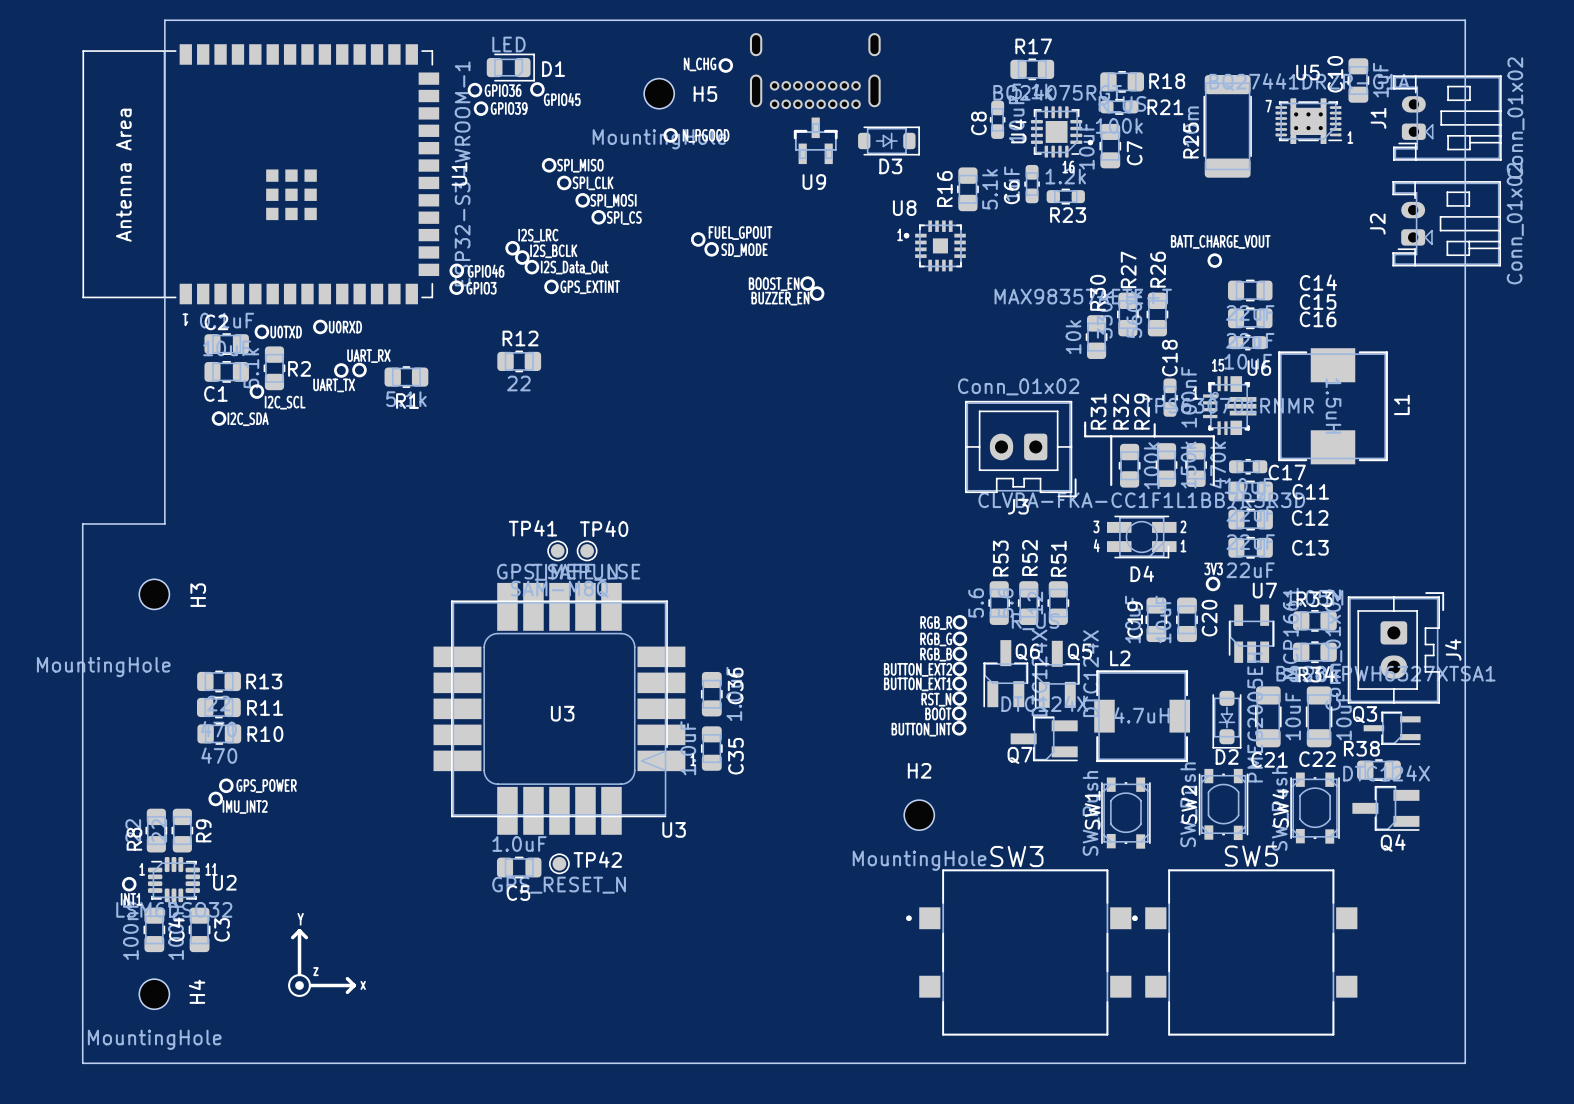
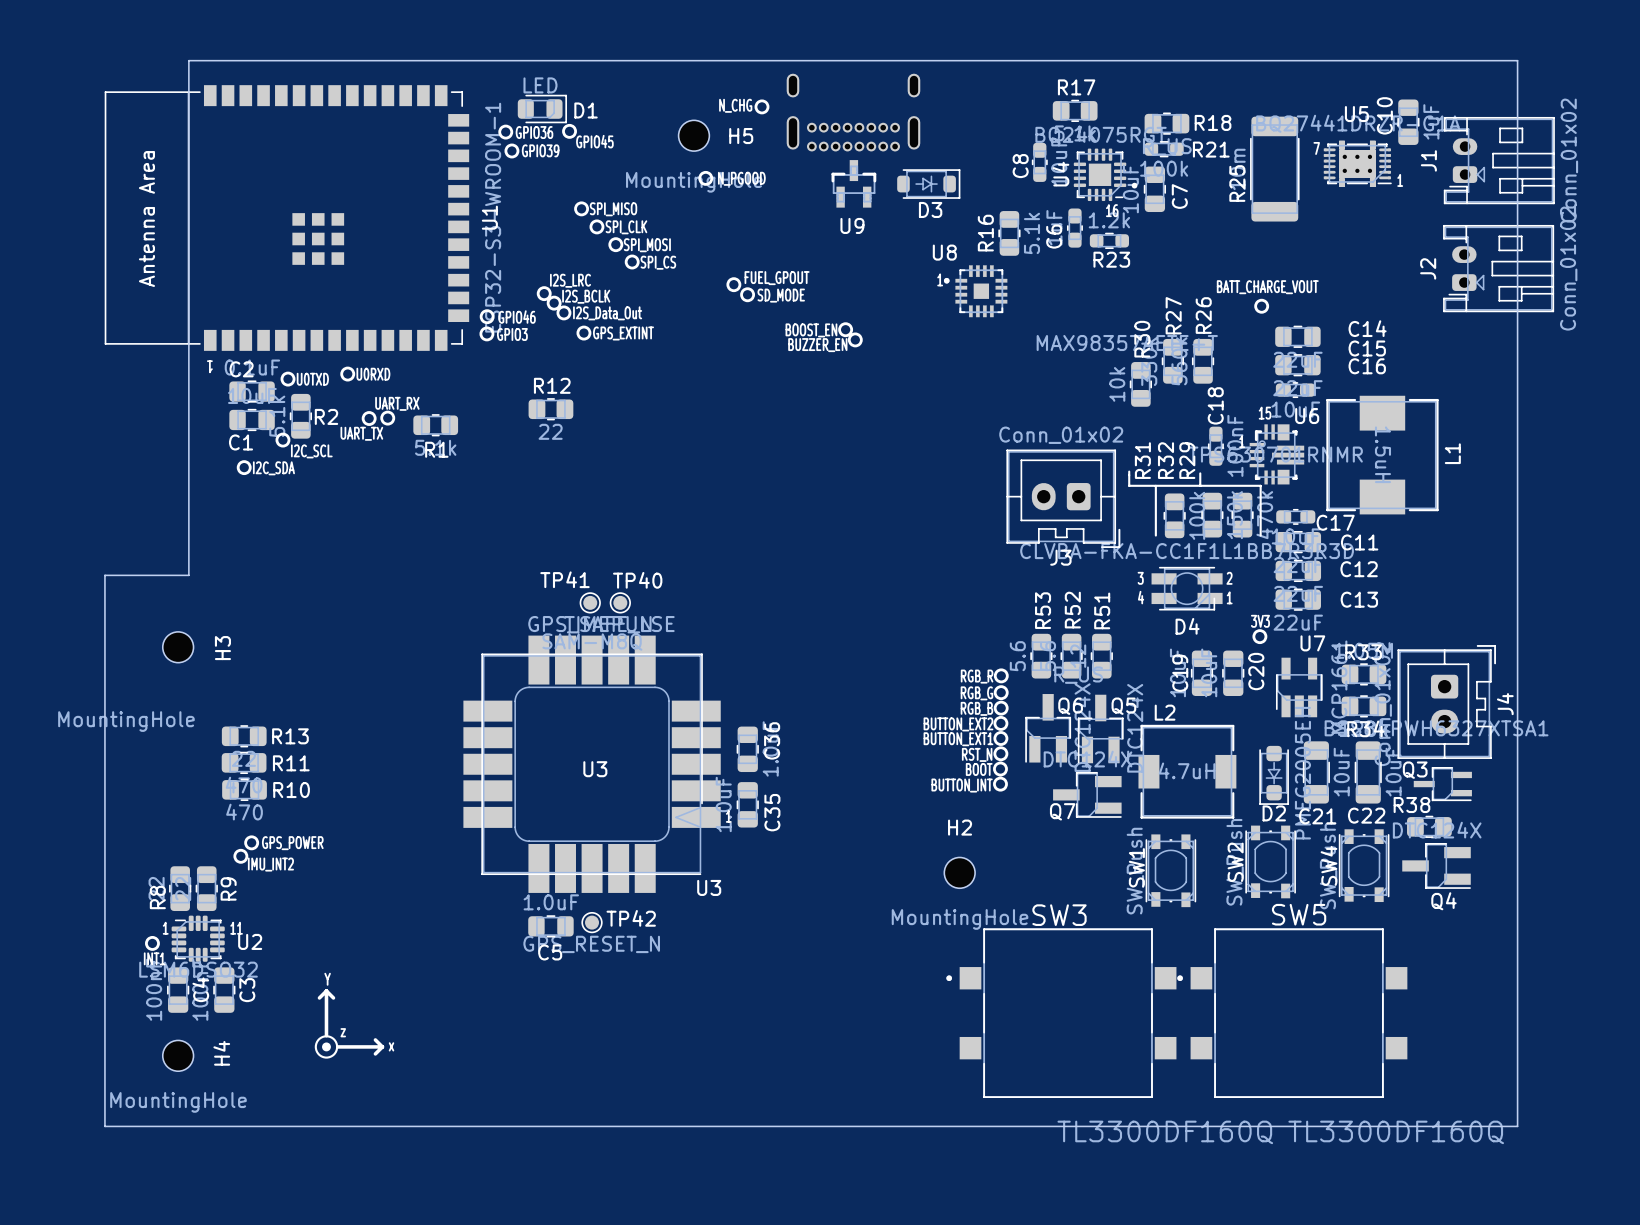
SW3 value: none -> TL3300DF160Q (1165, 1132)
SW5 value: none -> TL3300DF160Q (1396, 1132)

